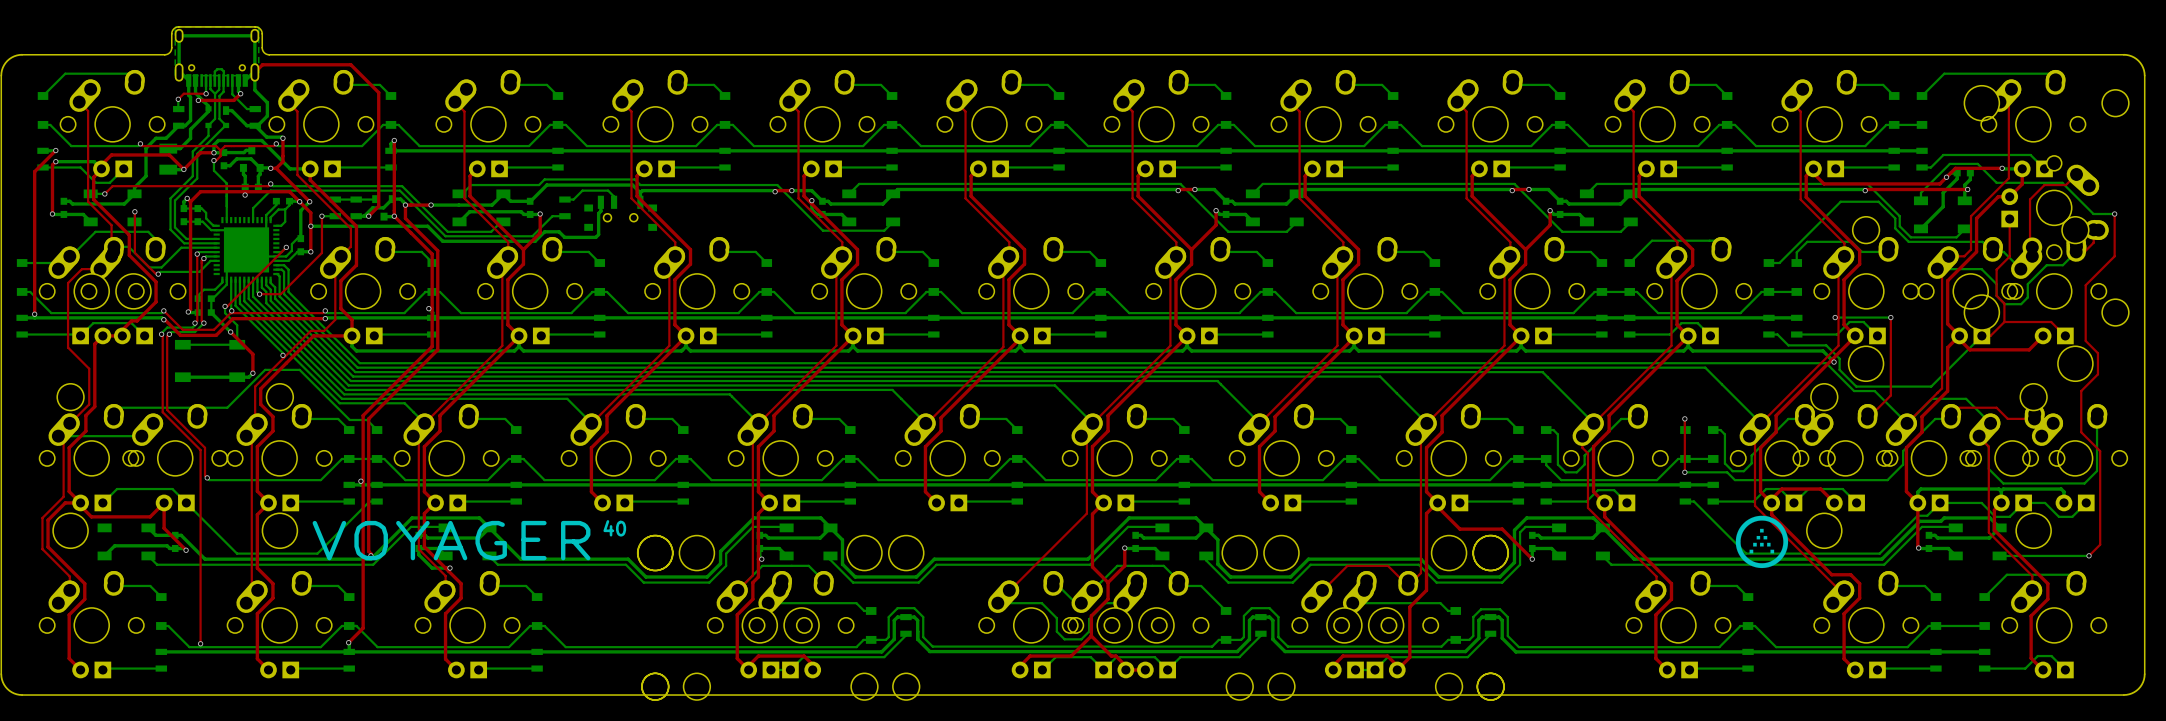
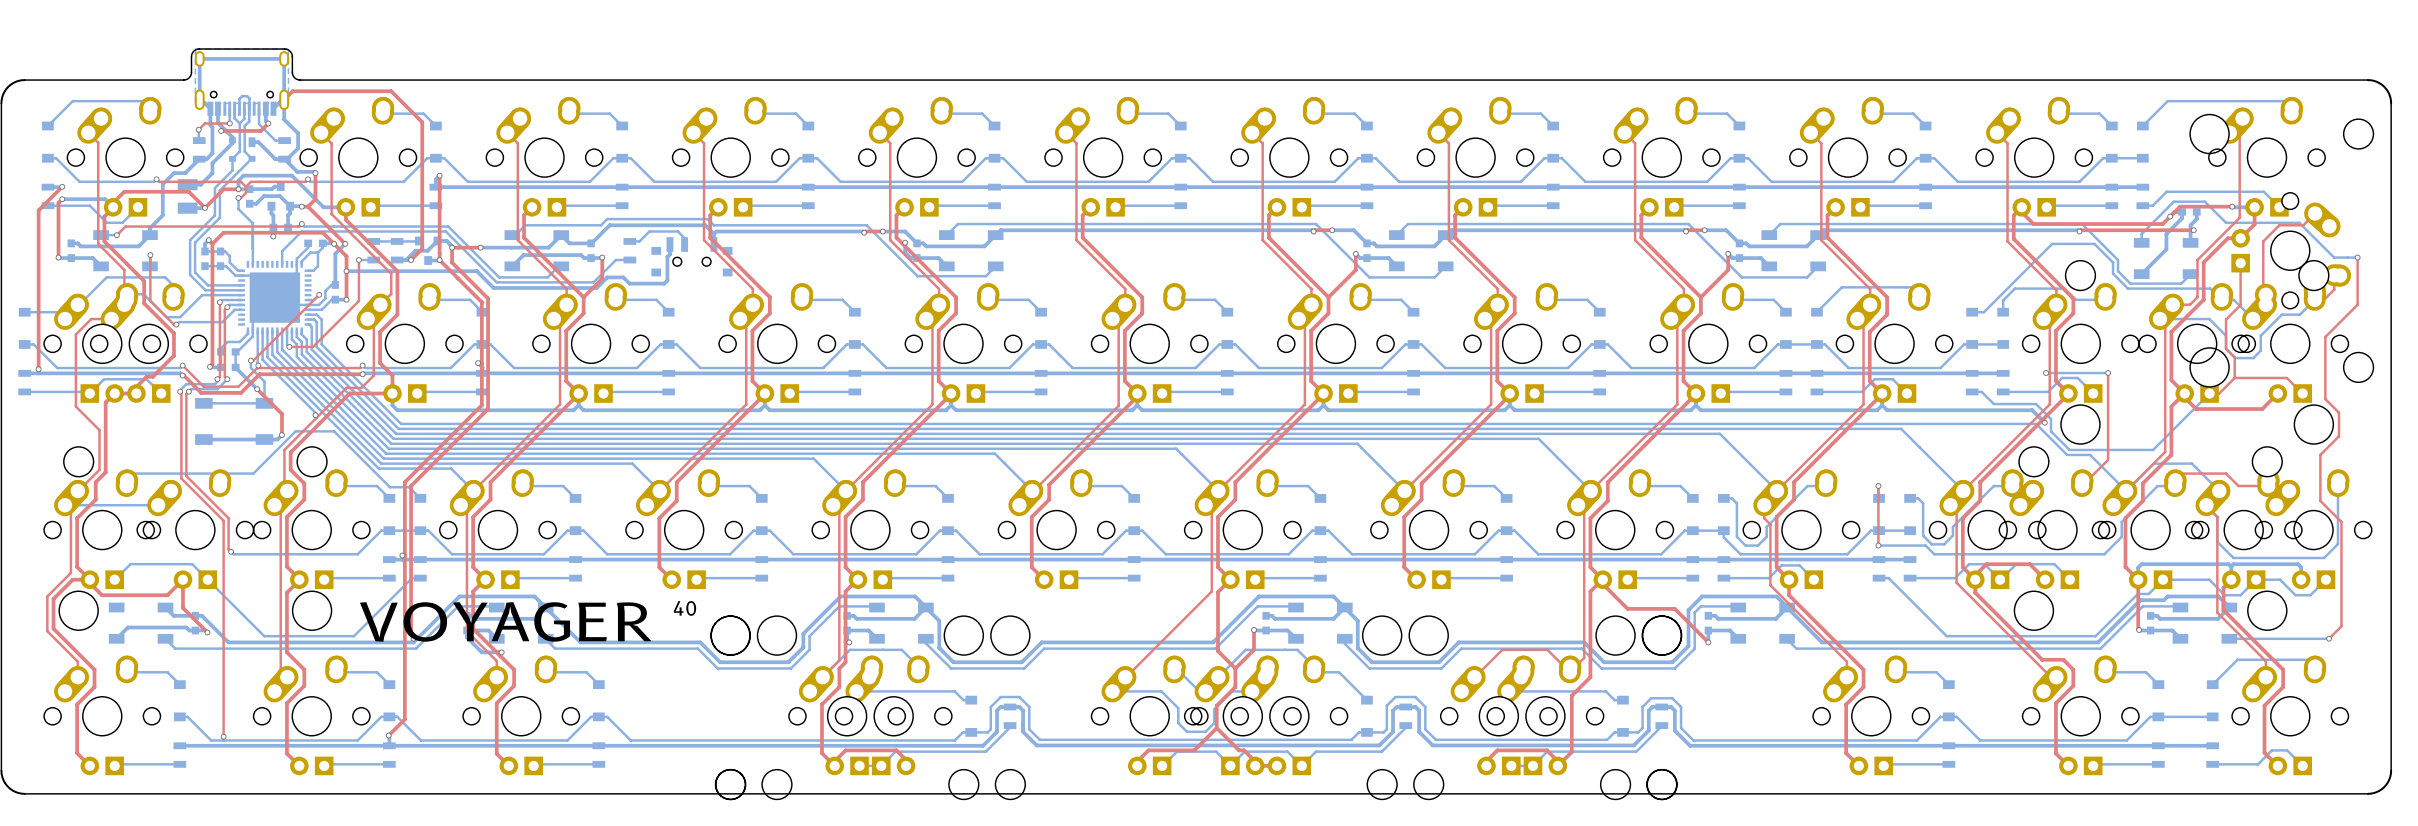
drawing: [1735, 515, 1789, 569] -> none

